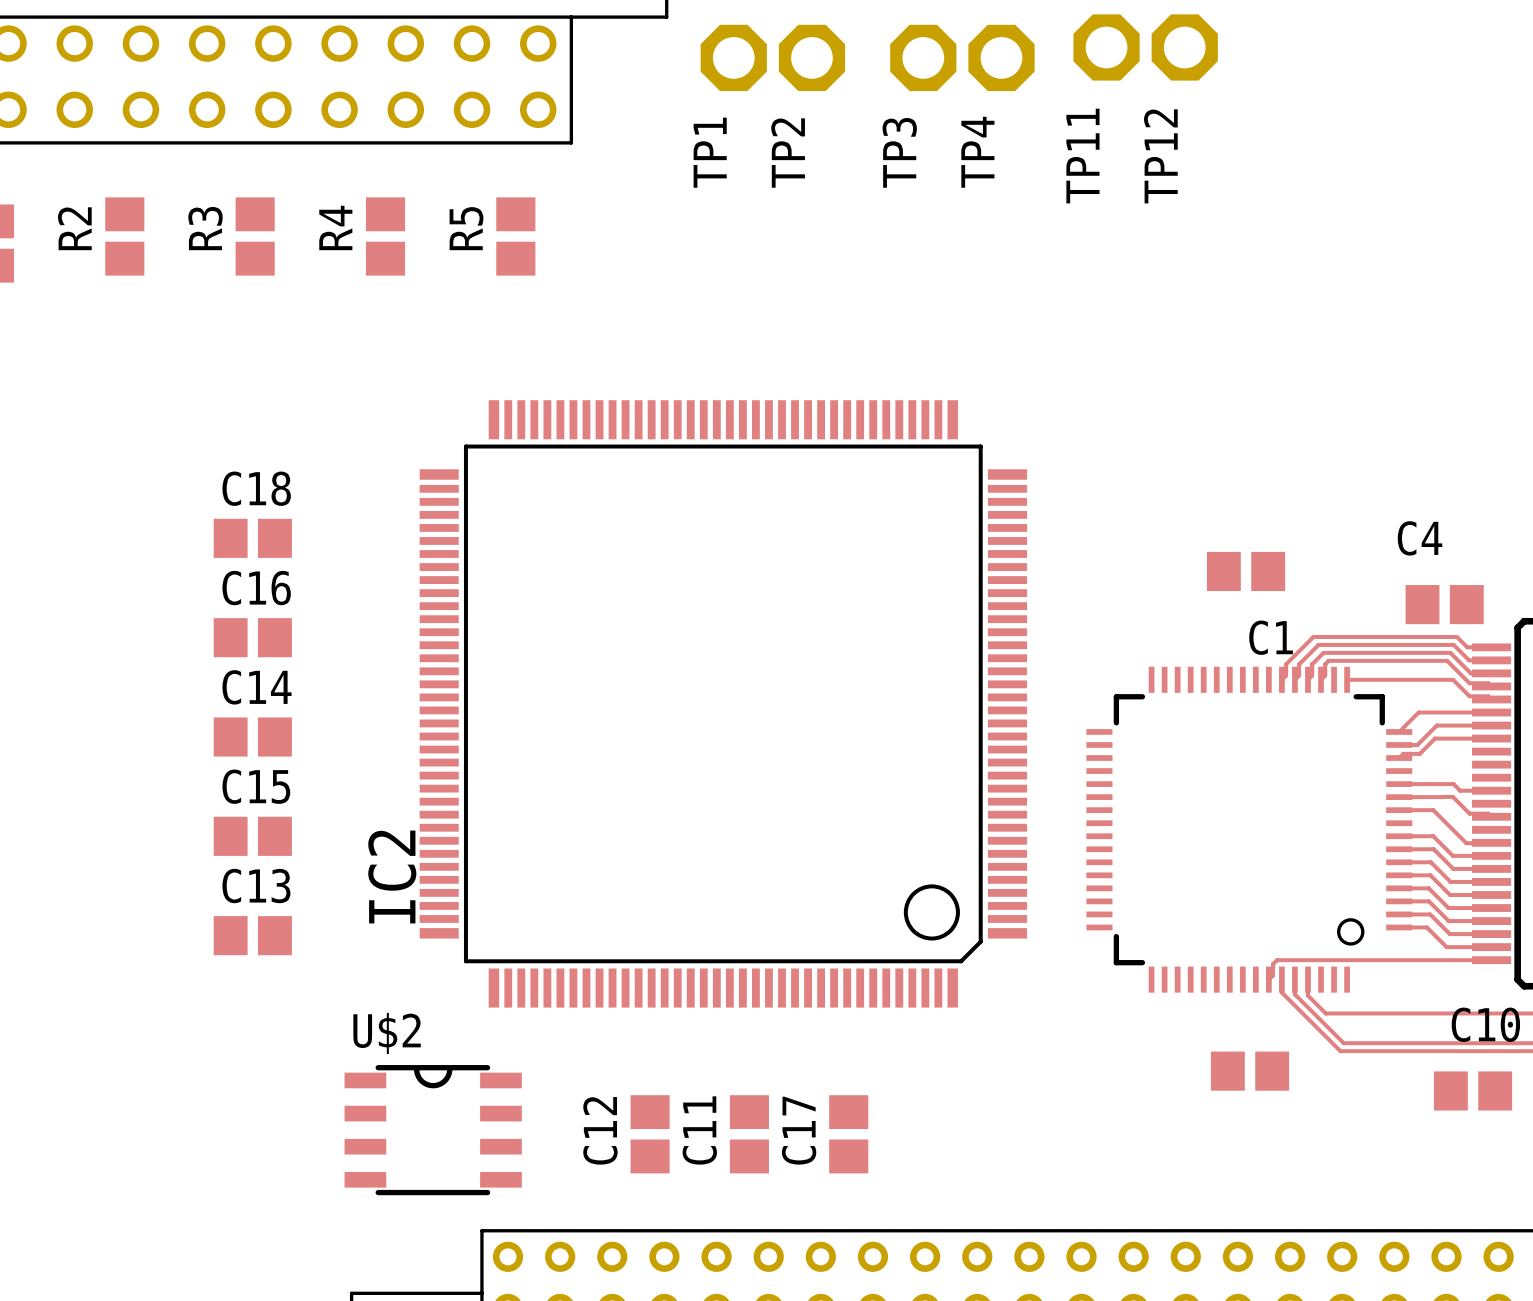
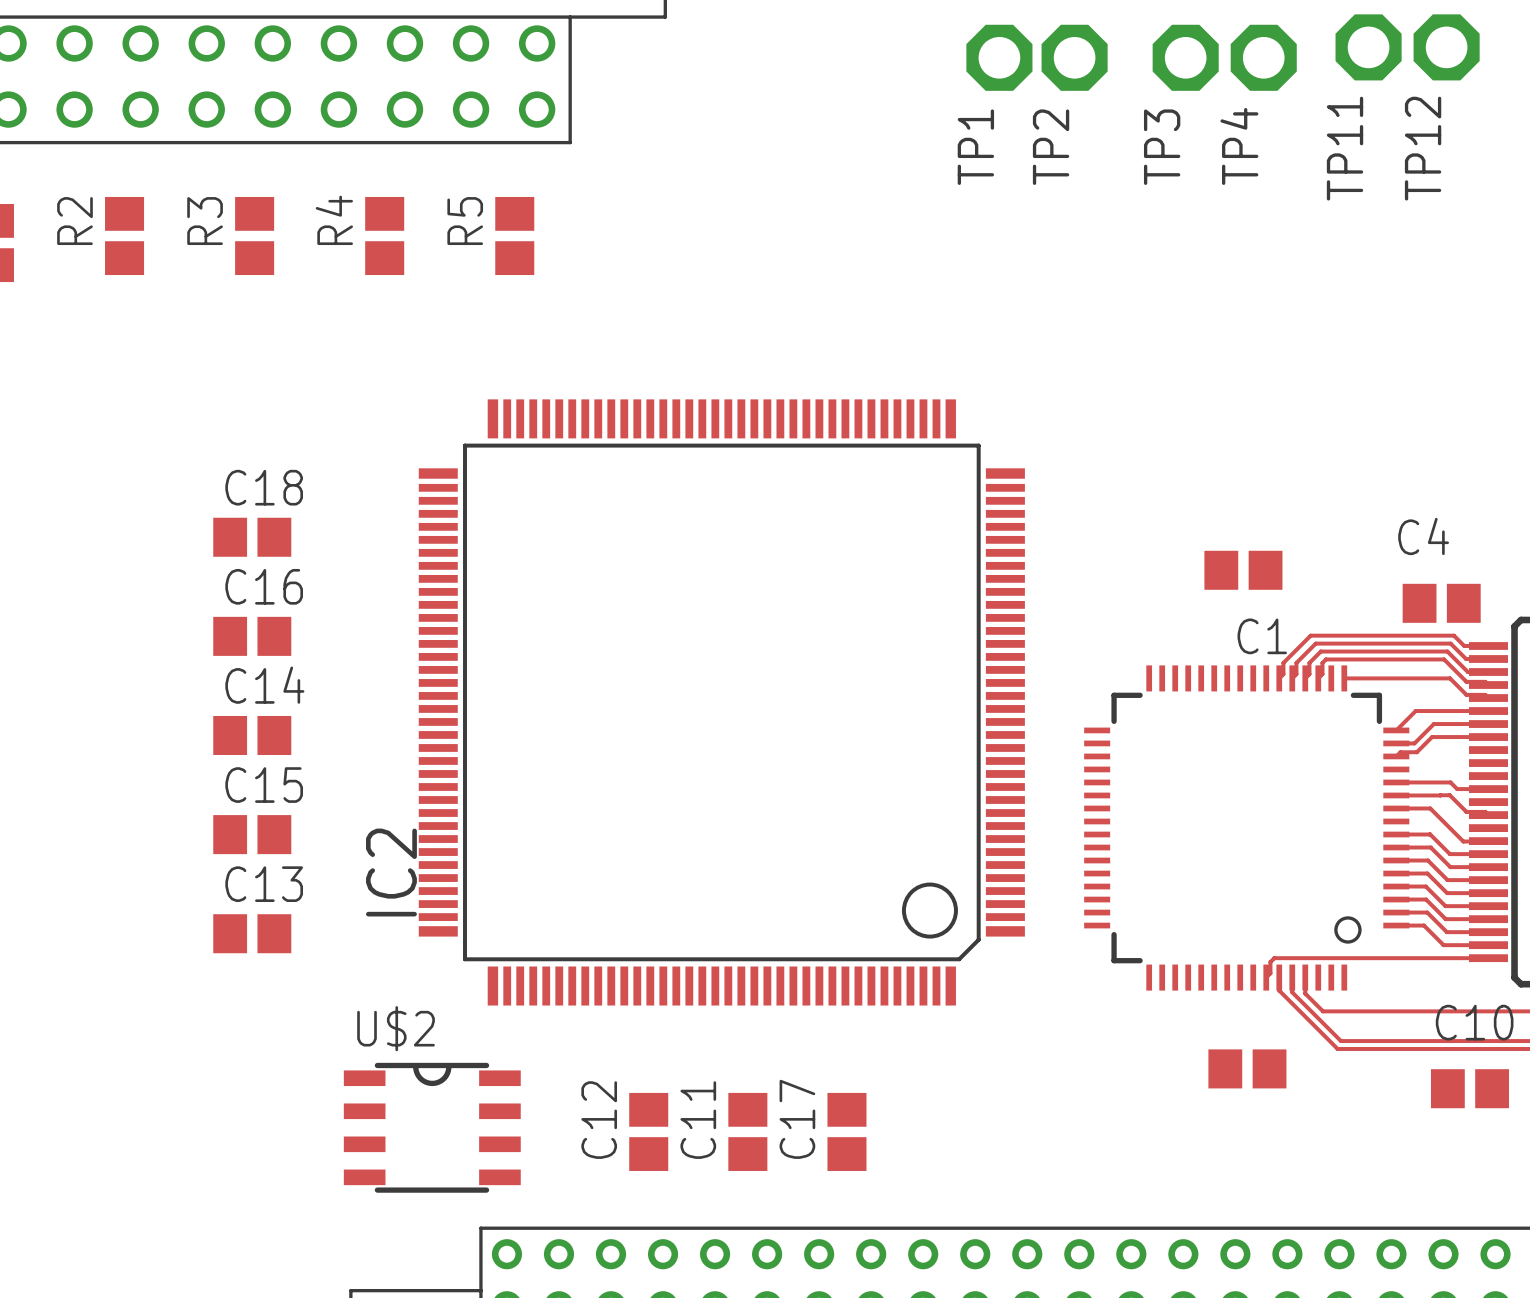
TP11 position: (1106, 47) -> (1368, 47)
TP12 position: (1184, 47) -> (1446, 47)
TP1: (733, 57) -> none
TP2 position: (811, 57) -> (1074, 57)
TP3 position: (923, 57) -> (1185, 57)
TP4: none -> (1263, 57)
TP4 name: TP4 (977, 152) -> TP1 (975, 147)

